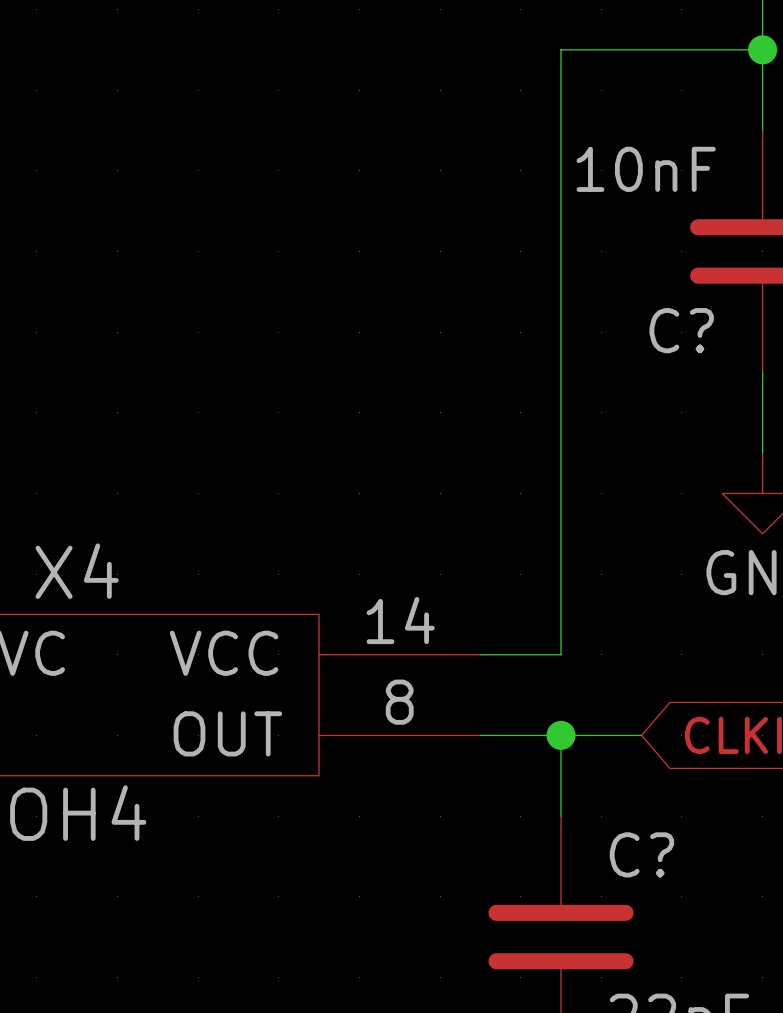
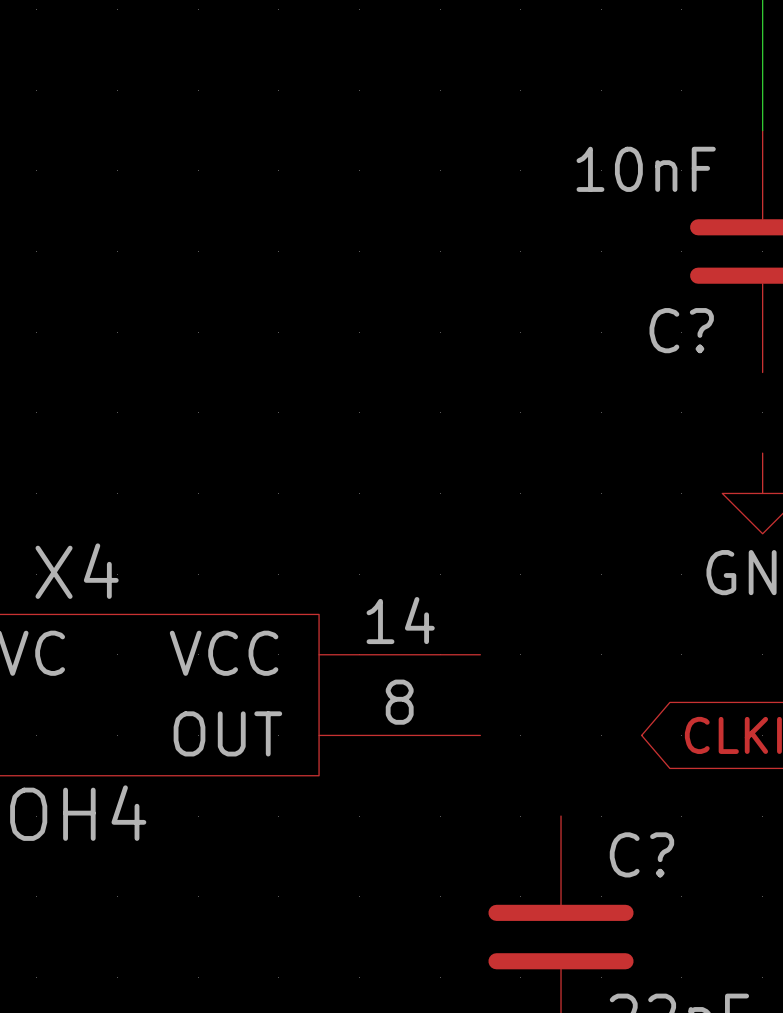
wire: (762, 49) (561, 49) (561, 654) (480, 654) -> none
junction: (762, 49) -> none
wire: (762, 372) (762, 453) -> none
wire: (480, 735) (641, 735) -> none
wire: (561, 735) (561, 816) -> none
junction: (561, 735) -> none

